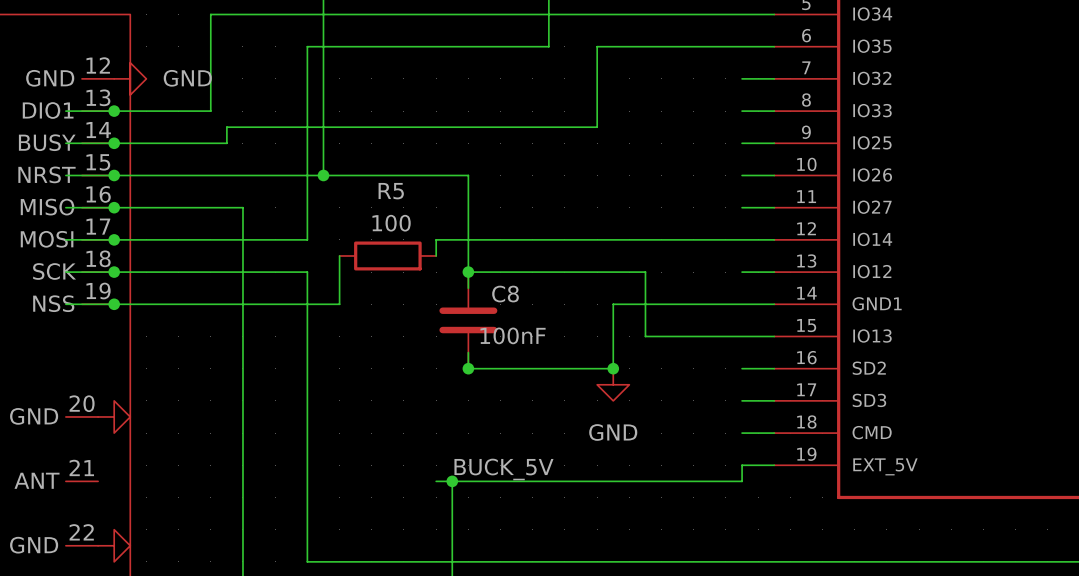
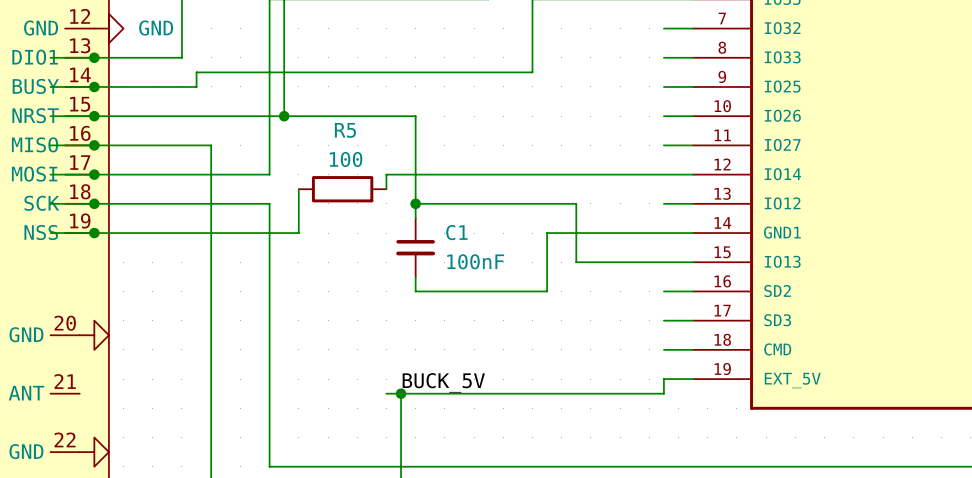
C8: 100nF (468, 320) -> none
C1: none -> 100nF (415, 247)
junction: (468, 368) -> none
junction: (613, 368) -> none
power symbol: GND (613, 384) -> none

